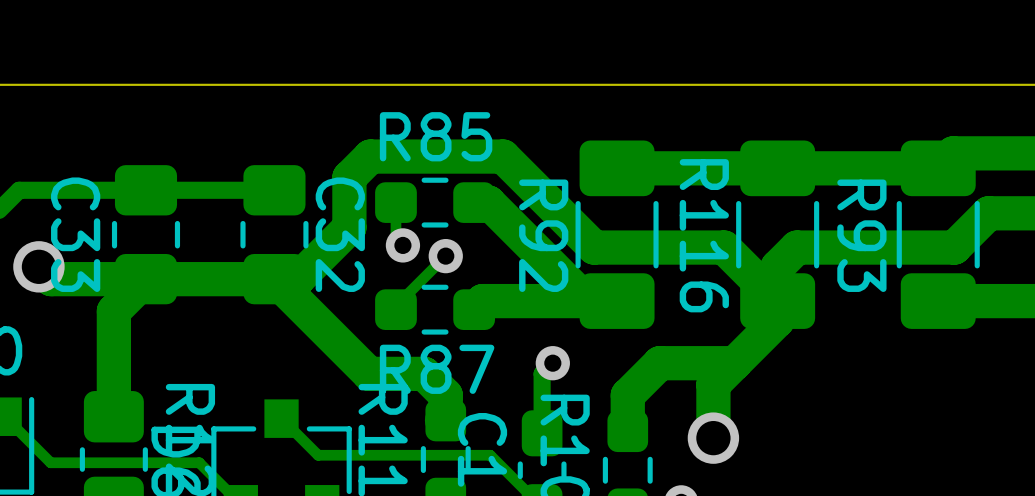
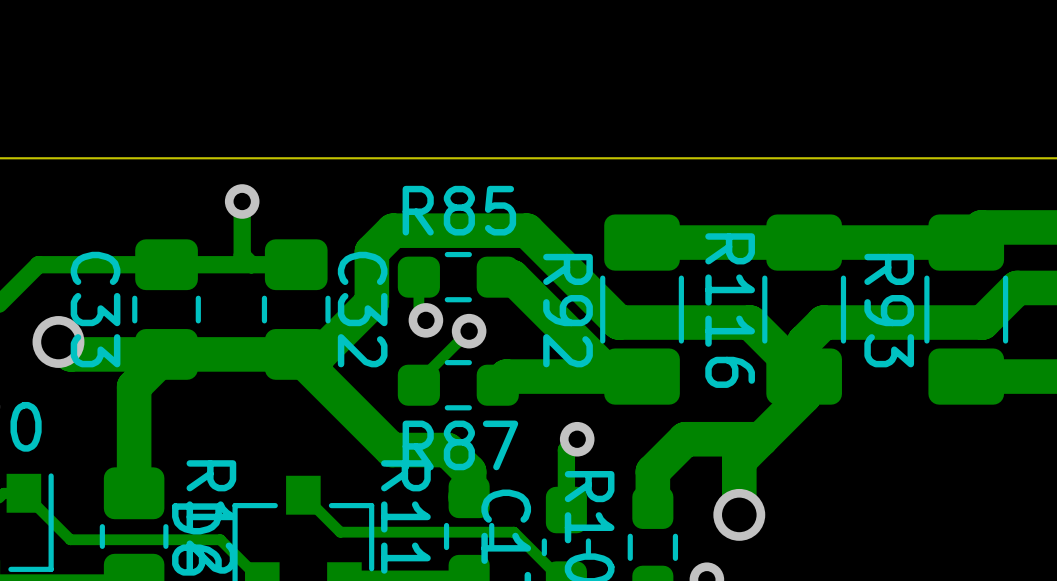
track: none -> (242, 201) (242, 255) (251, 264)
via: none -> (242, 201)

